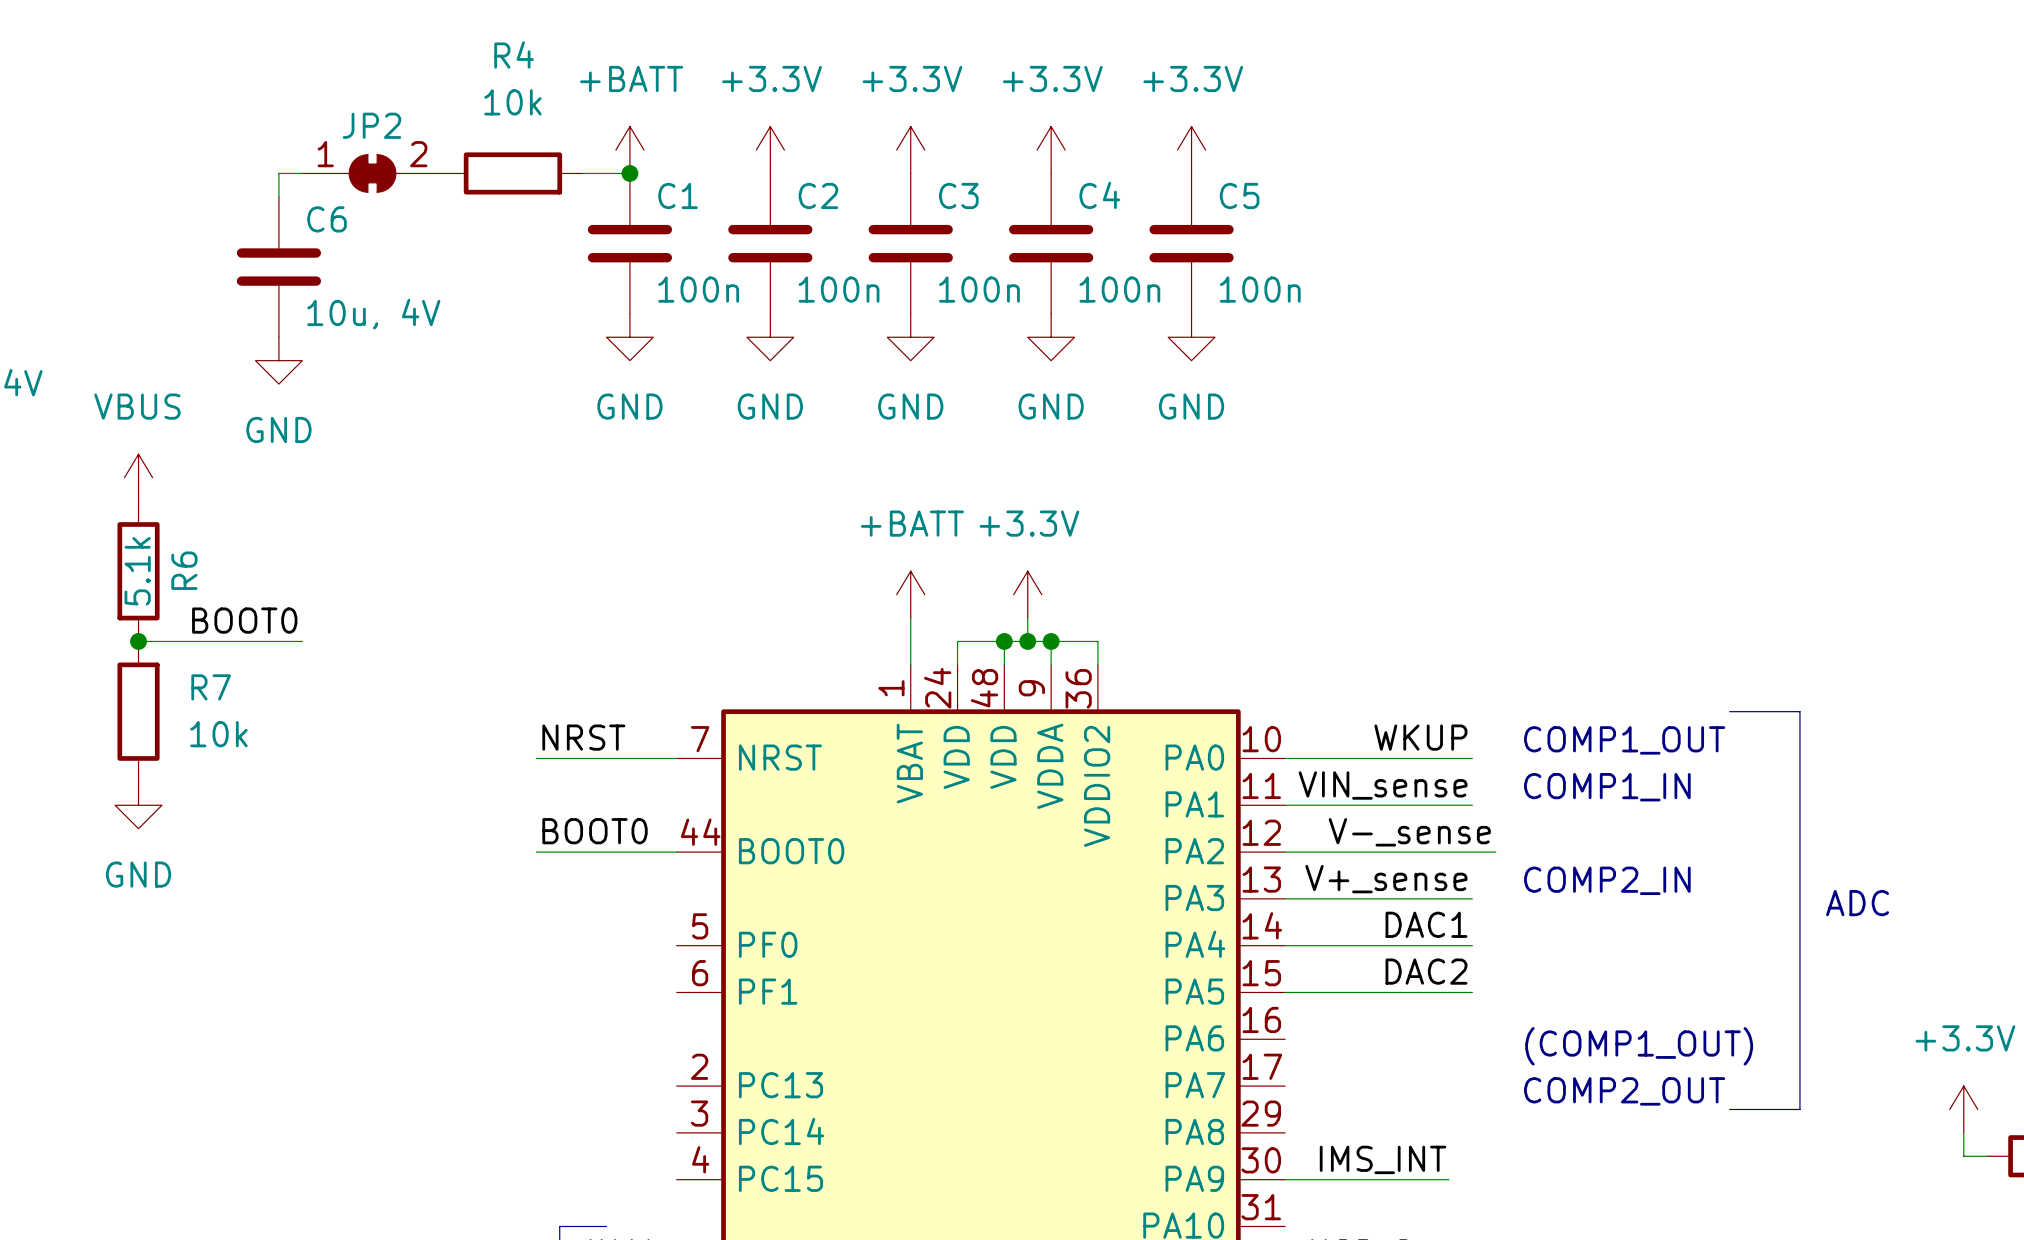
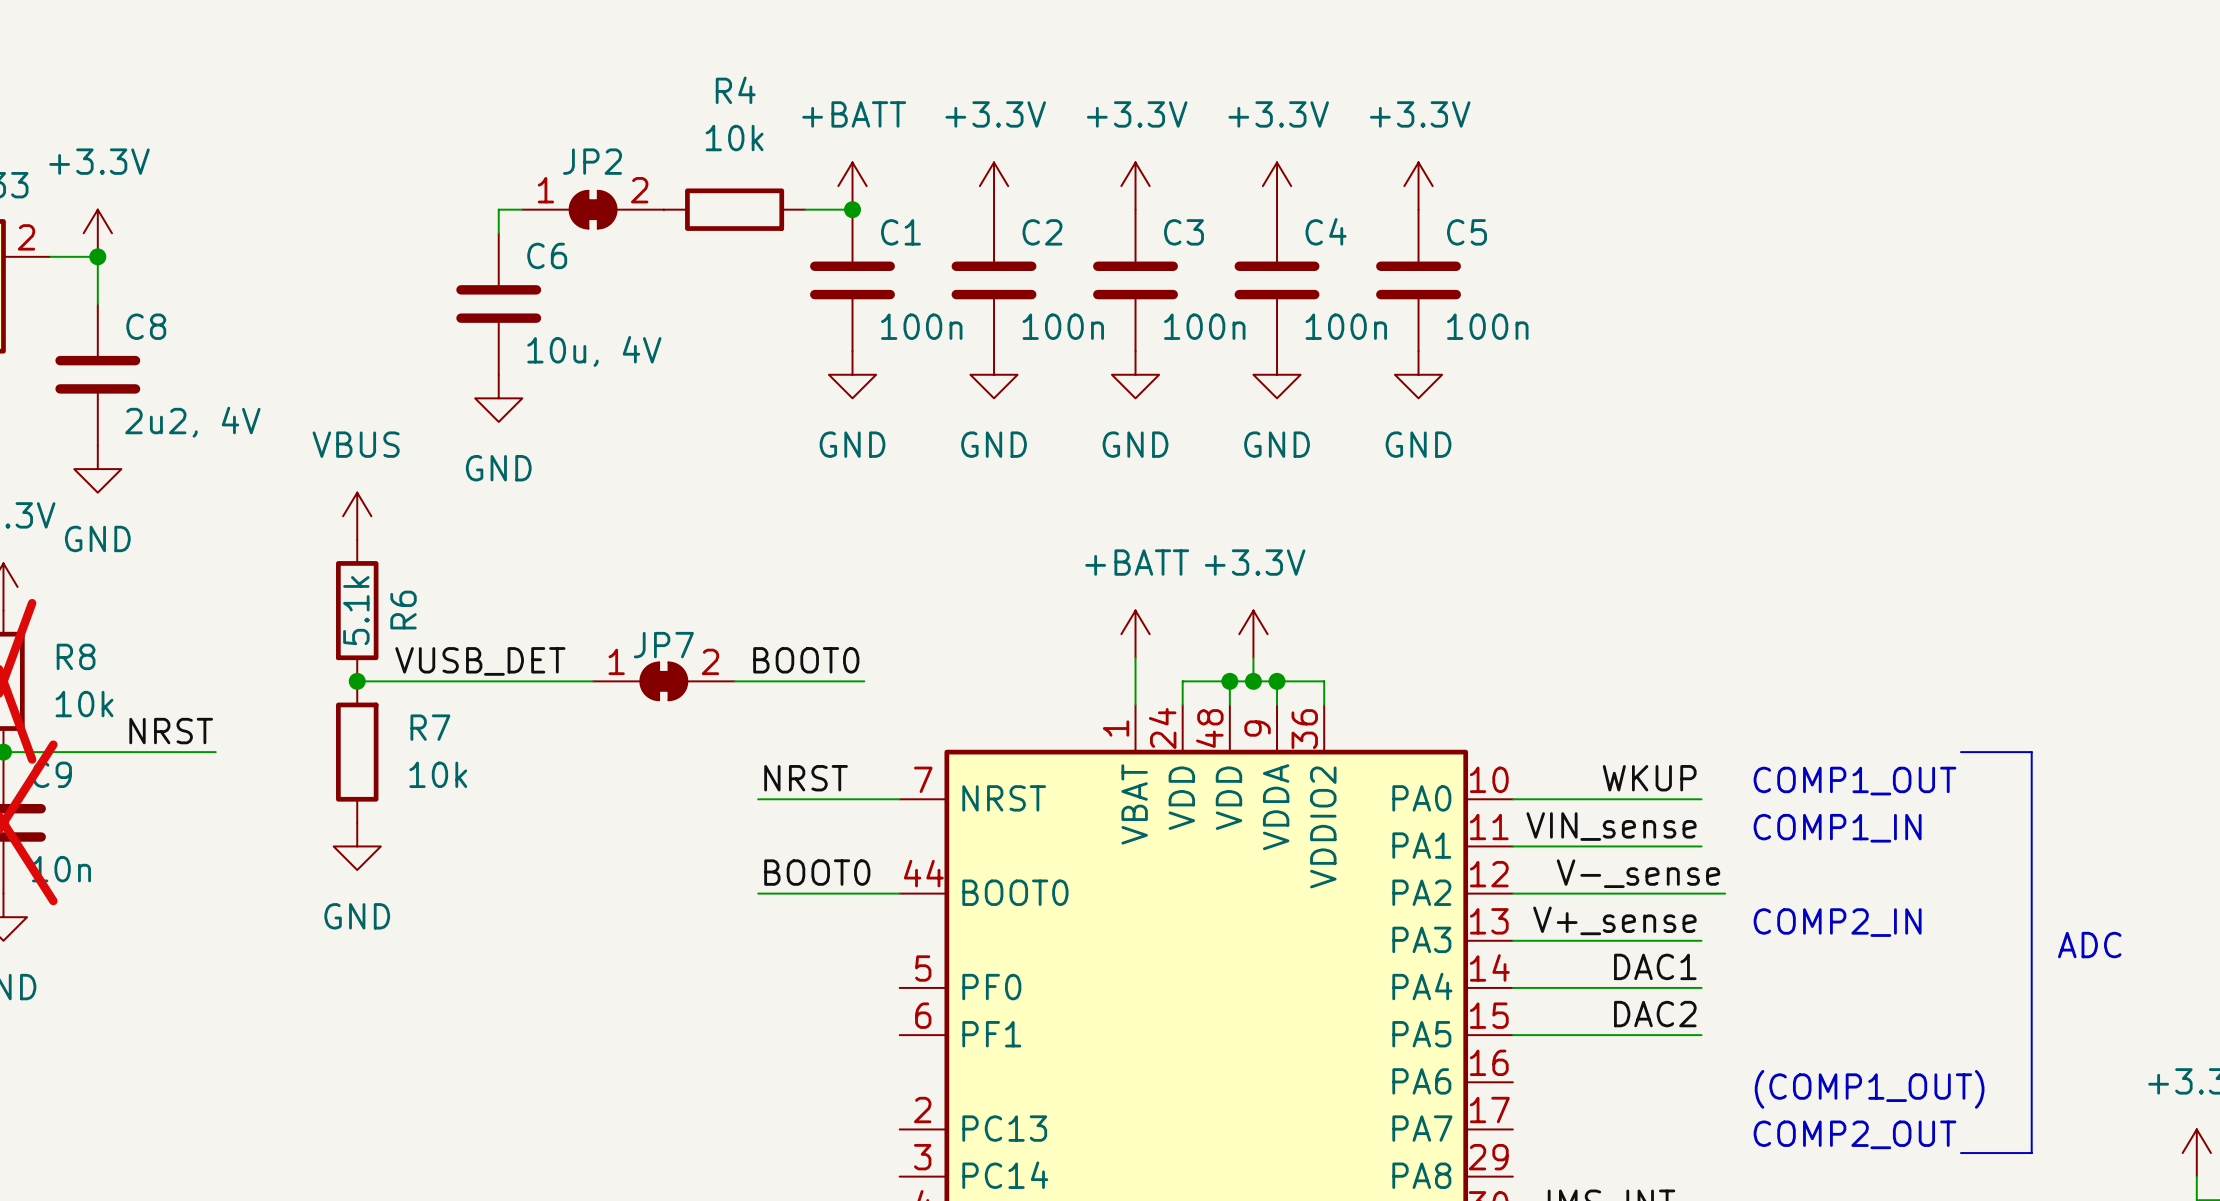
label position: BOOT0 (244, 620) -> BOOT0 (806, 660)
label: none -> VUSB_DET (480, 661)
wire: none -> (522, 681) (593, 681)
JP7: none -> (663, 681)
wire: none -> (734, 681) (864, 681)

